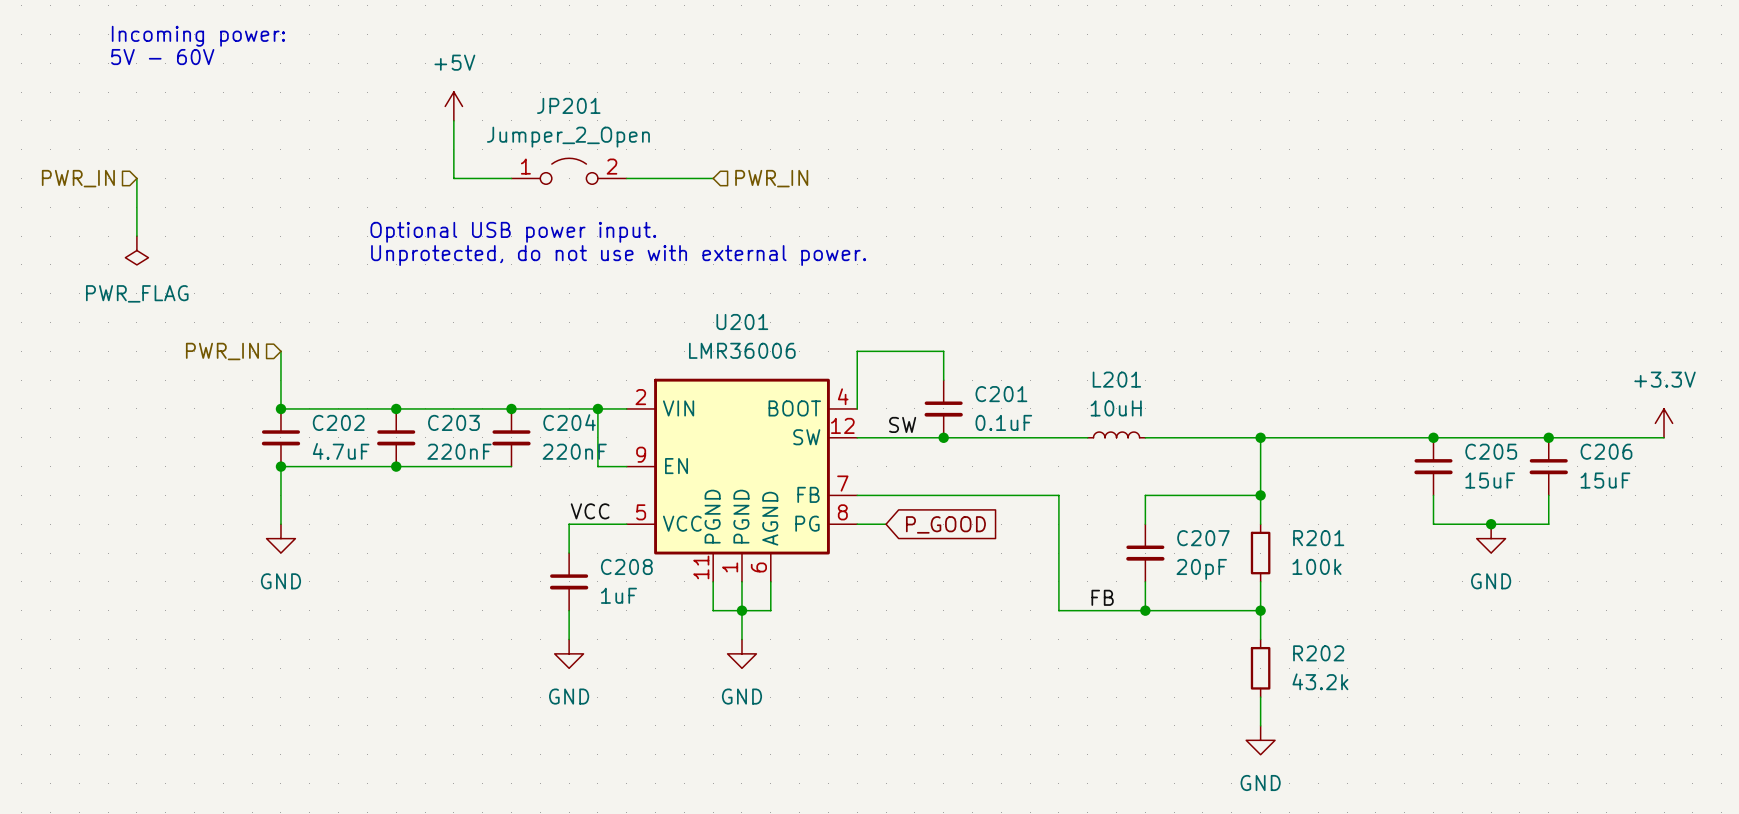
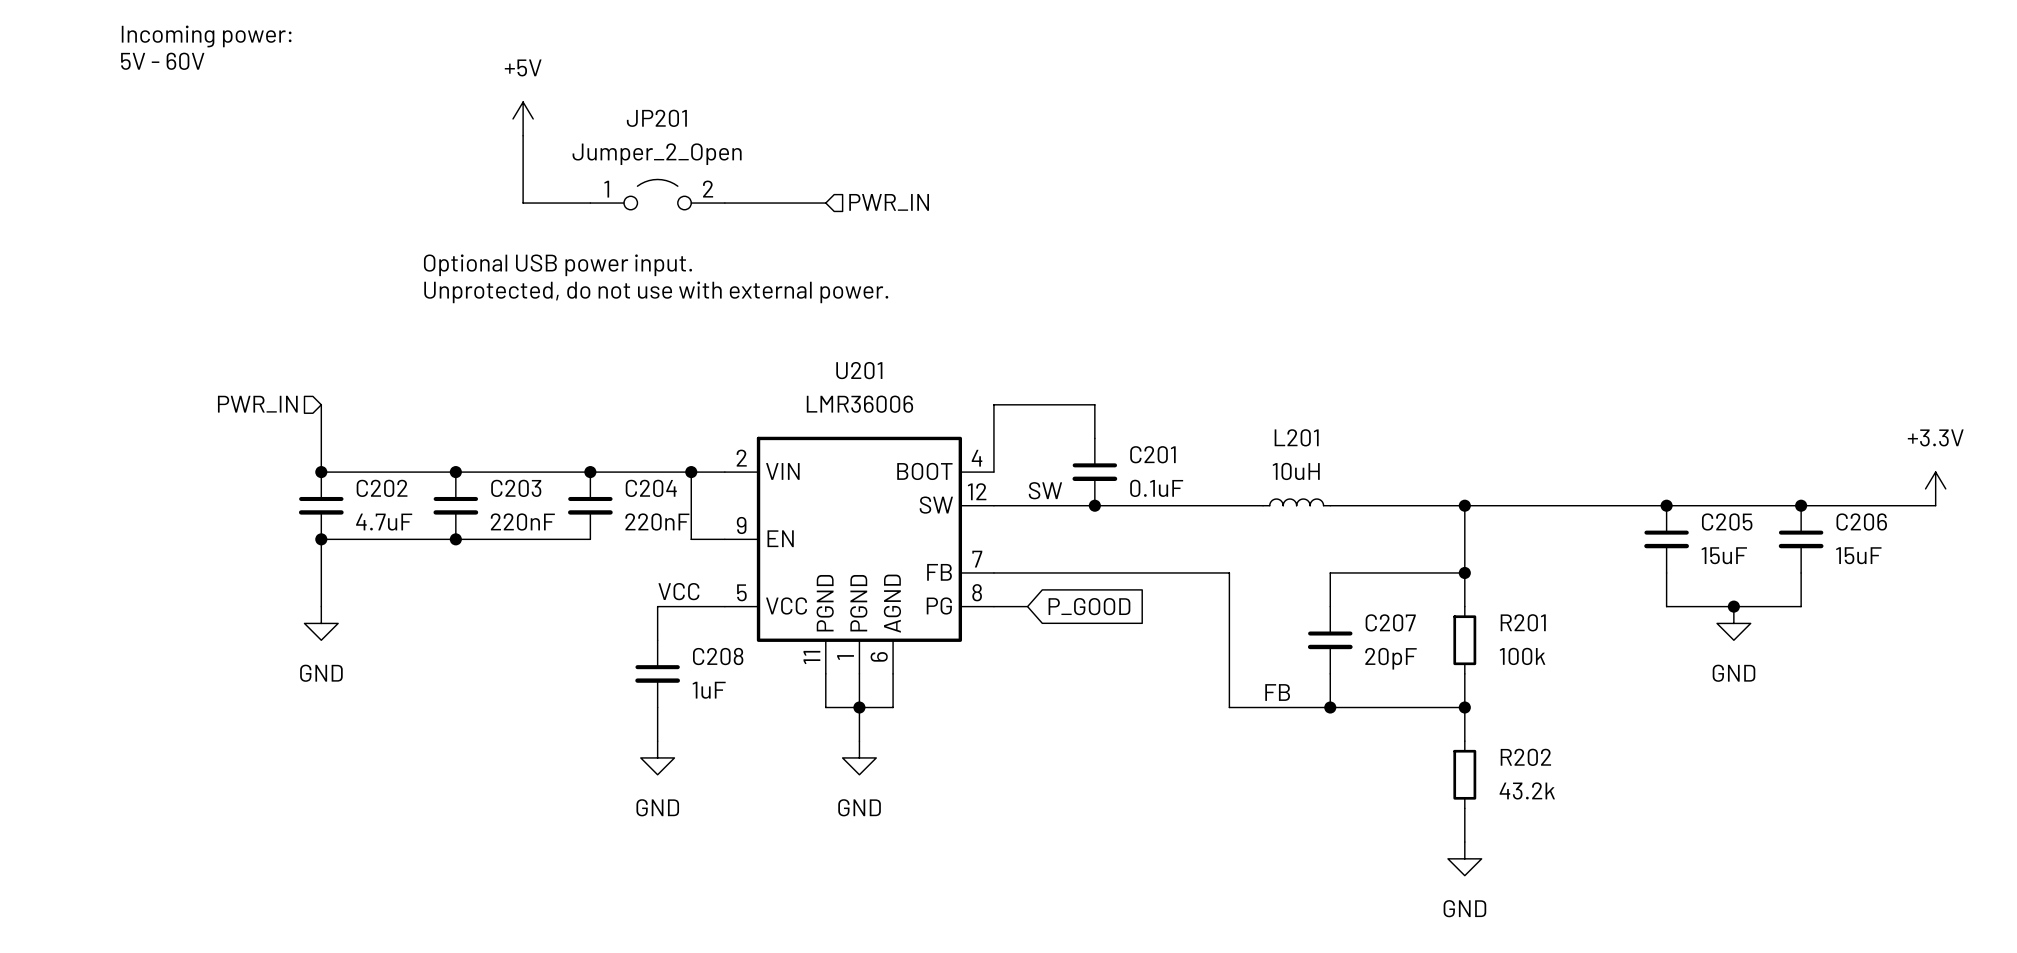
hierarchical label: PWR_IN (78, 178) -> none
wire: (136, 178) (136, 236) -> none
power symbol: PWR_FLAG (136, 250) -> none

